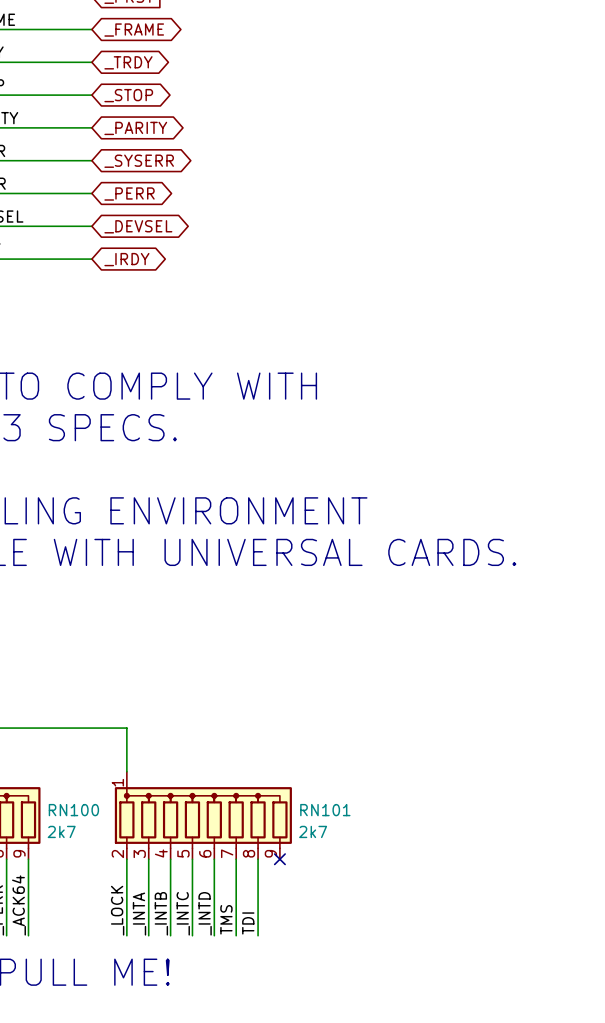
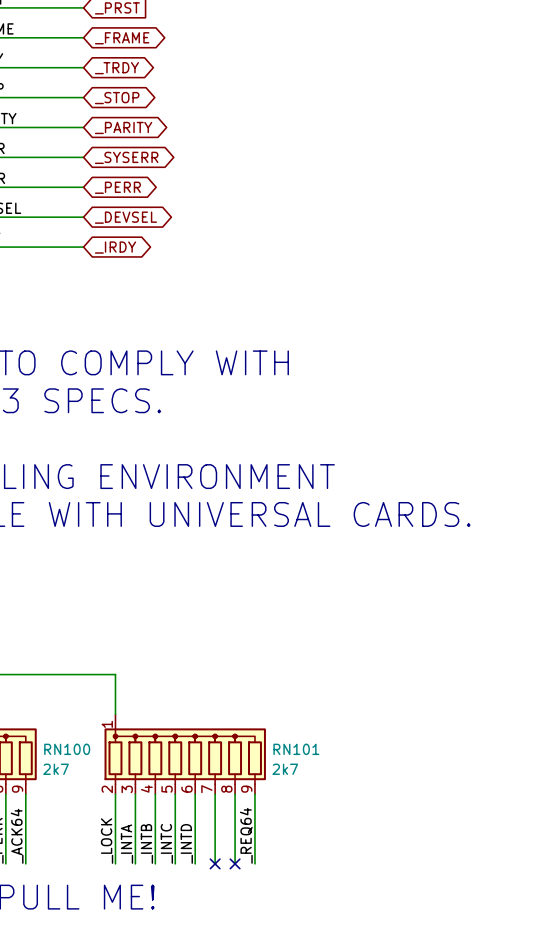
wire: none -> (254, 794) (254, 863)
no-connect mark: (279, 859) -> none
label: none -> _REQ64 (246, 835)
label: TMS (226, 919) -> none
label: TDI (248, 923) -> none
no-connect mark: none -> (215, 863)
no-connect mark: none -> (235, 863)

